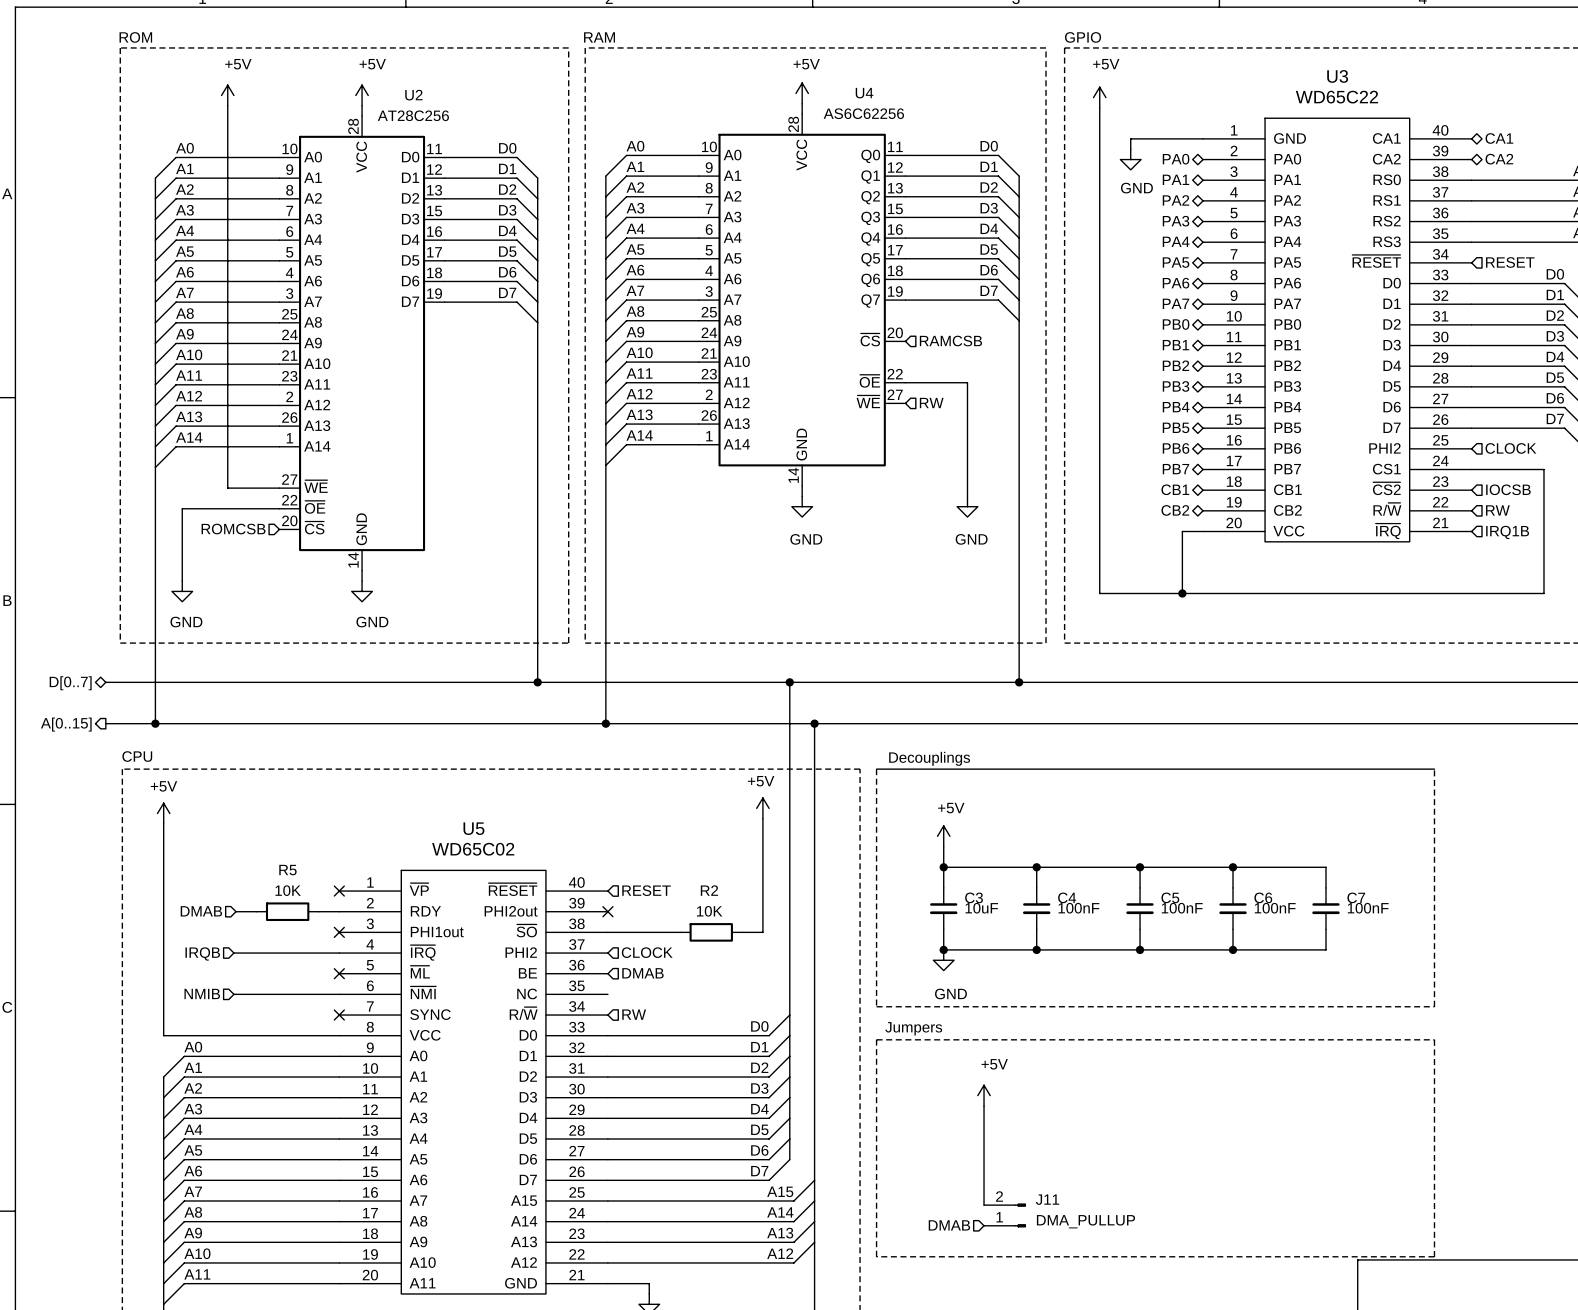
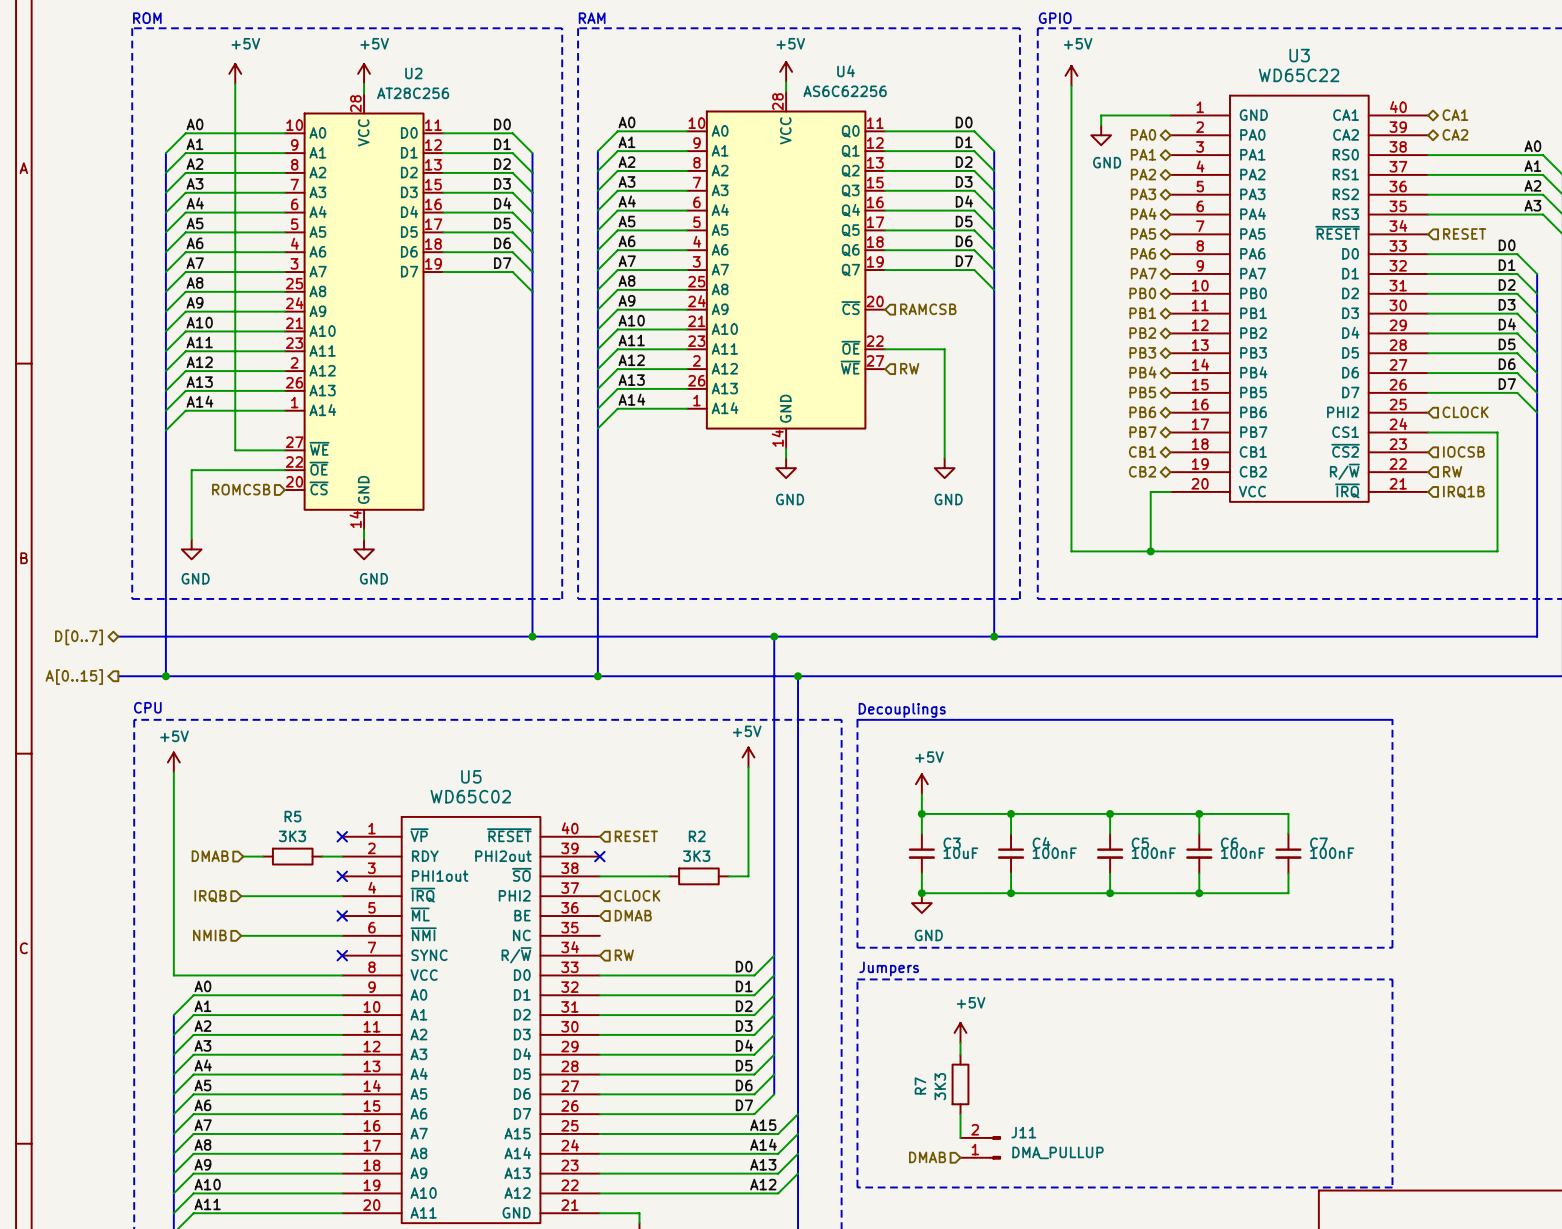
R5 value: 10K (288, 890) -> 3K3 (292, 836)
R2 value: 10K (709, 911) -> 3K3 (696, 856)
wire: (984, 1118) (984, 1180) -> none
R7: none -> 3K3 (960, 1084)

